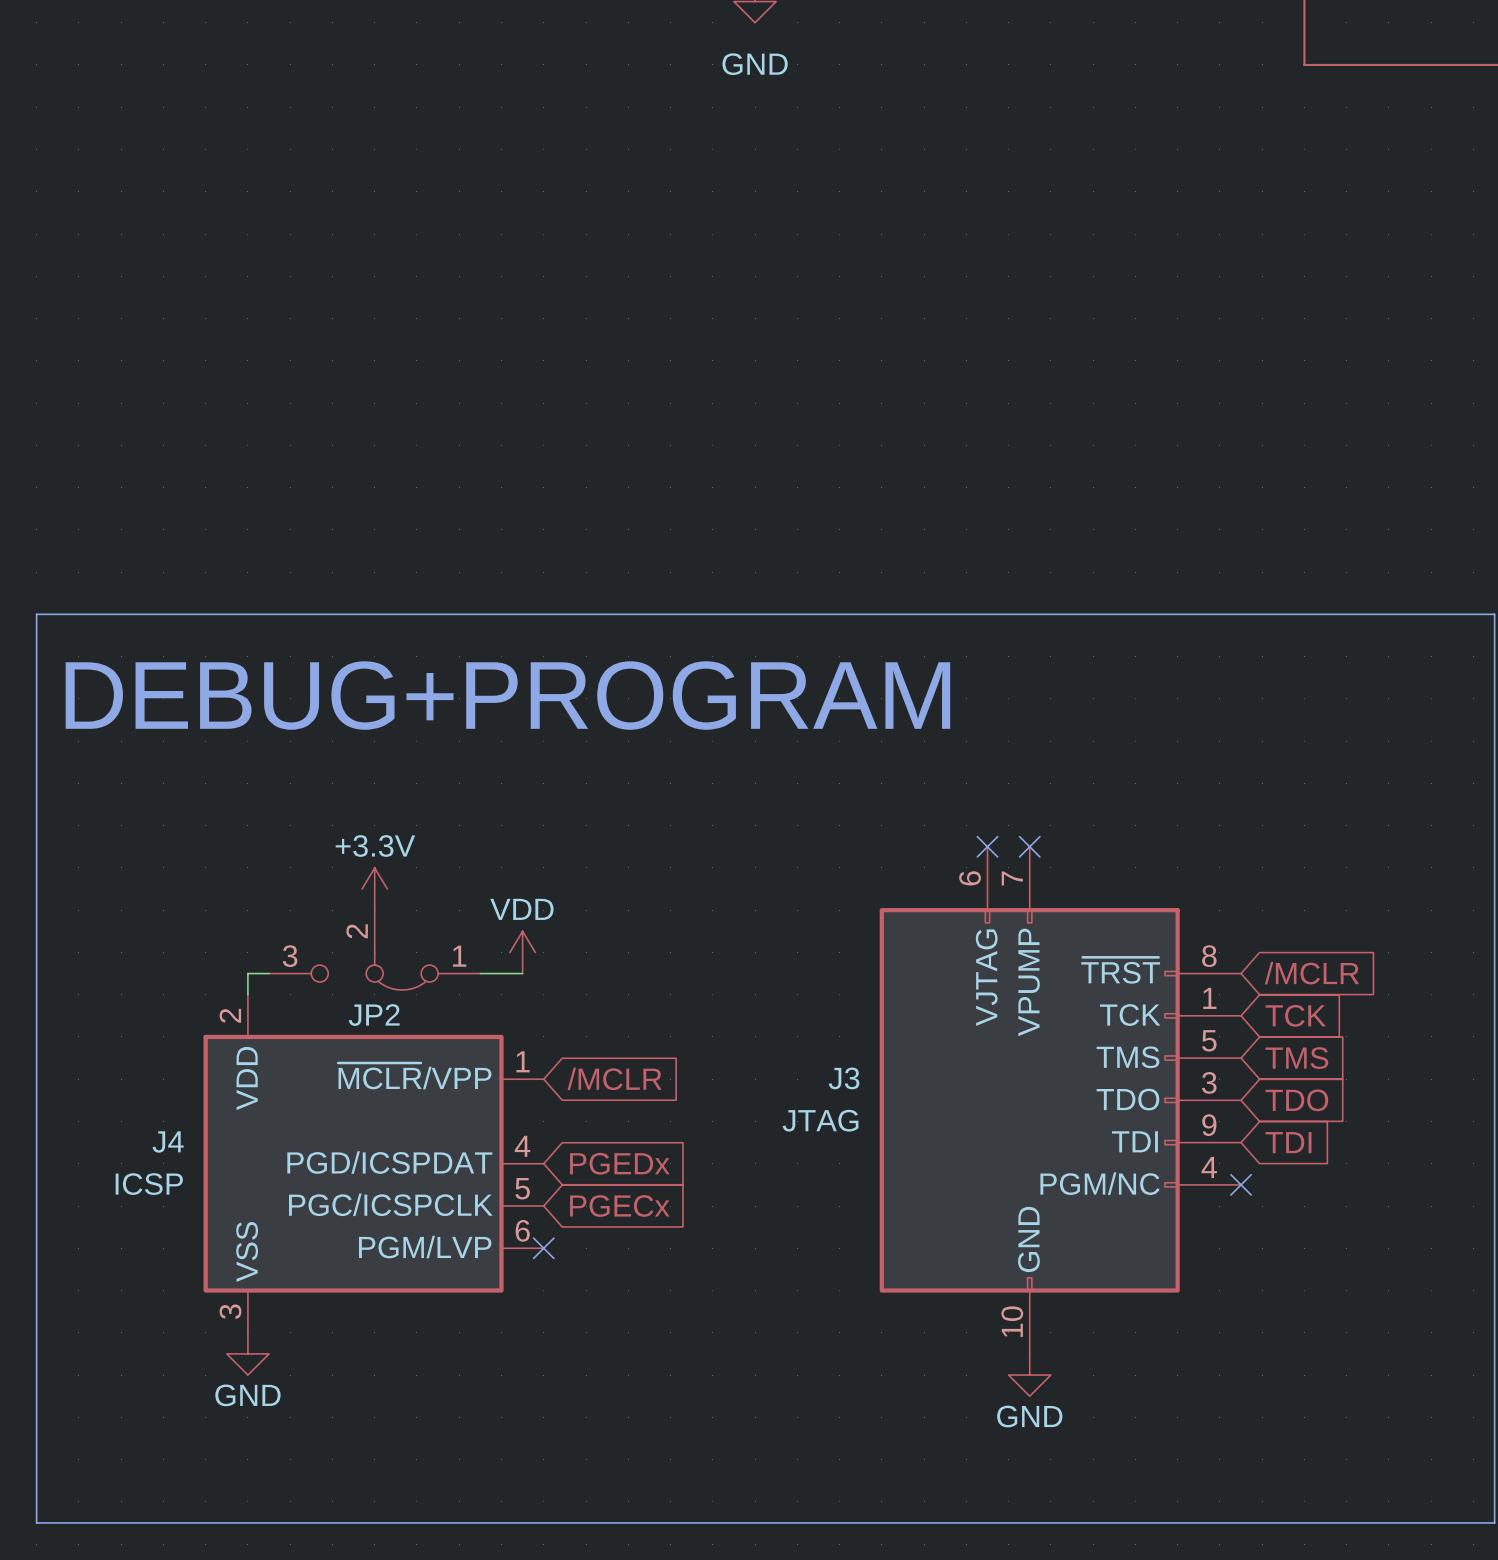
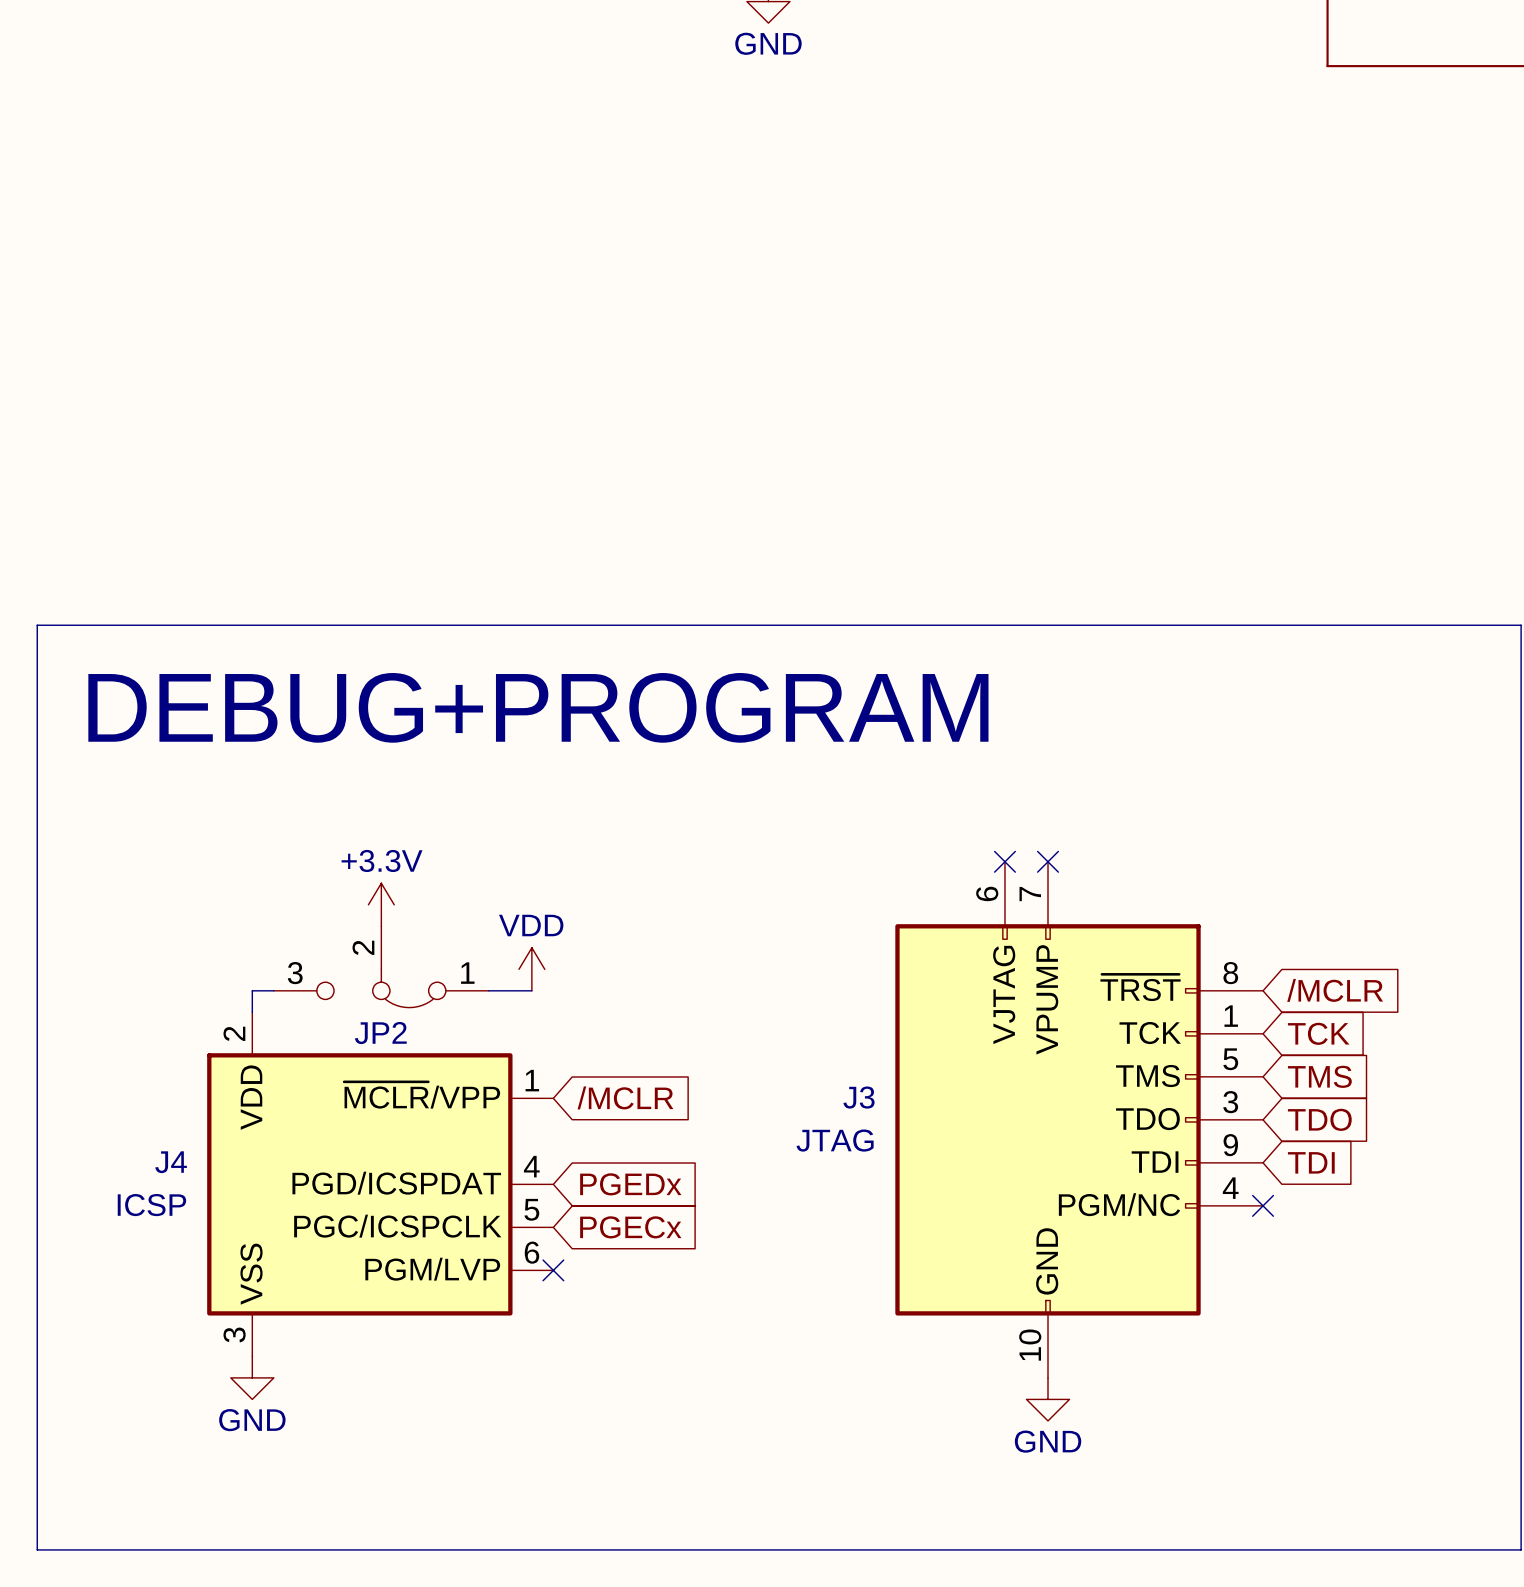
power symbol text position: GND (755, 64) -> GND (768, 43)
text position: DEBUG+PROGRAM (507, 695) -> DEBUG+PROGRAM (538, 707)

